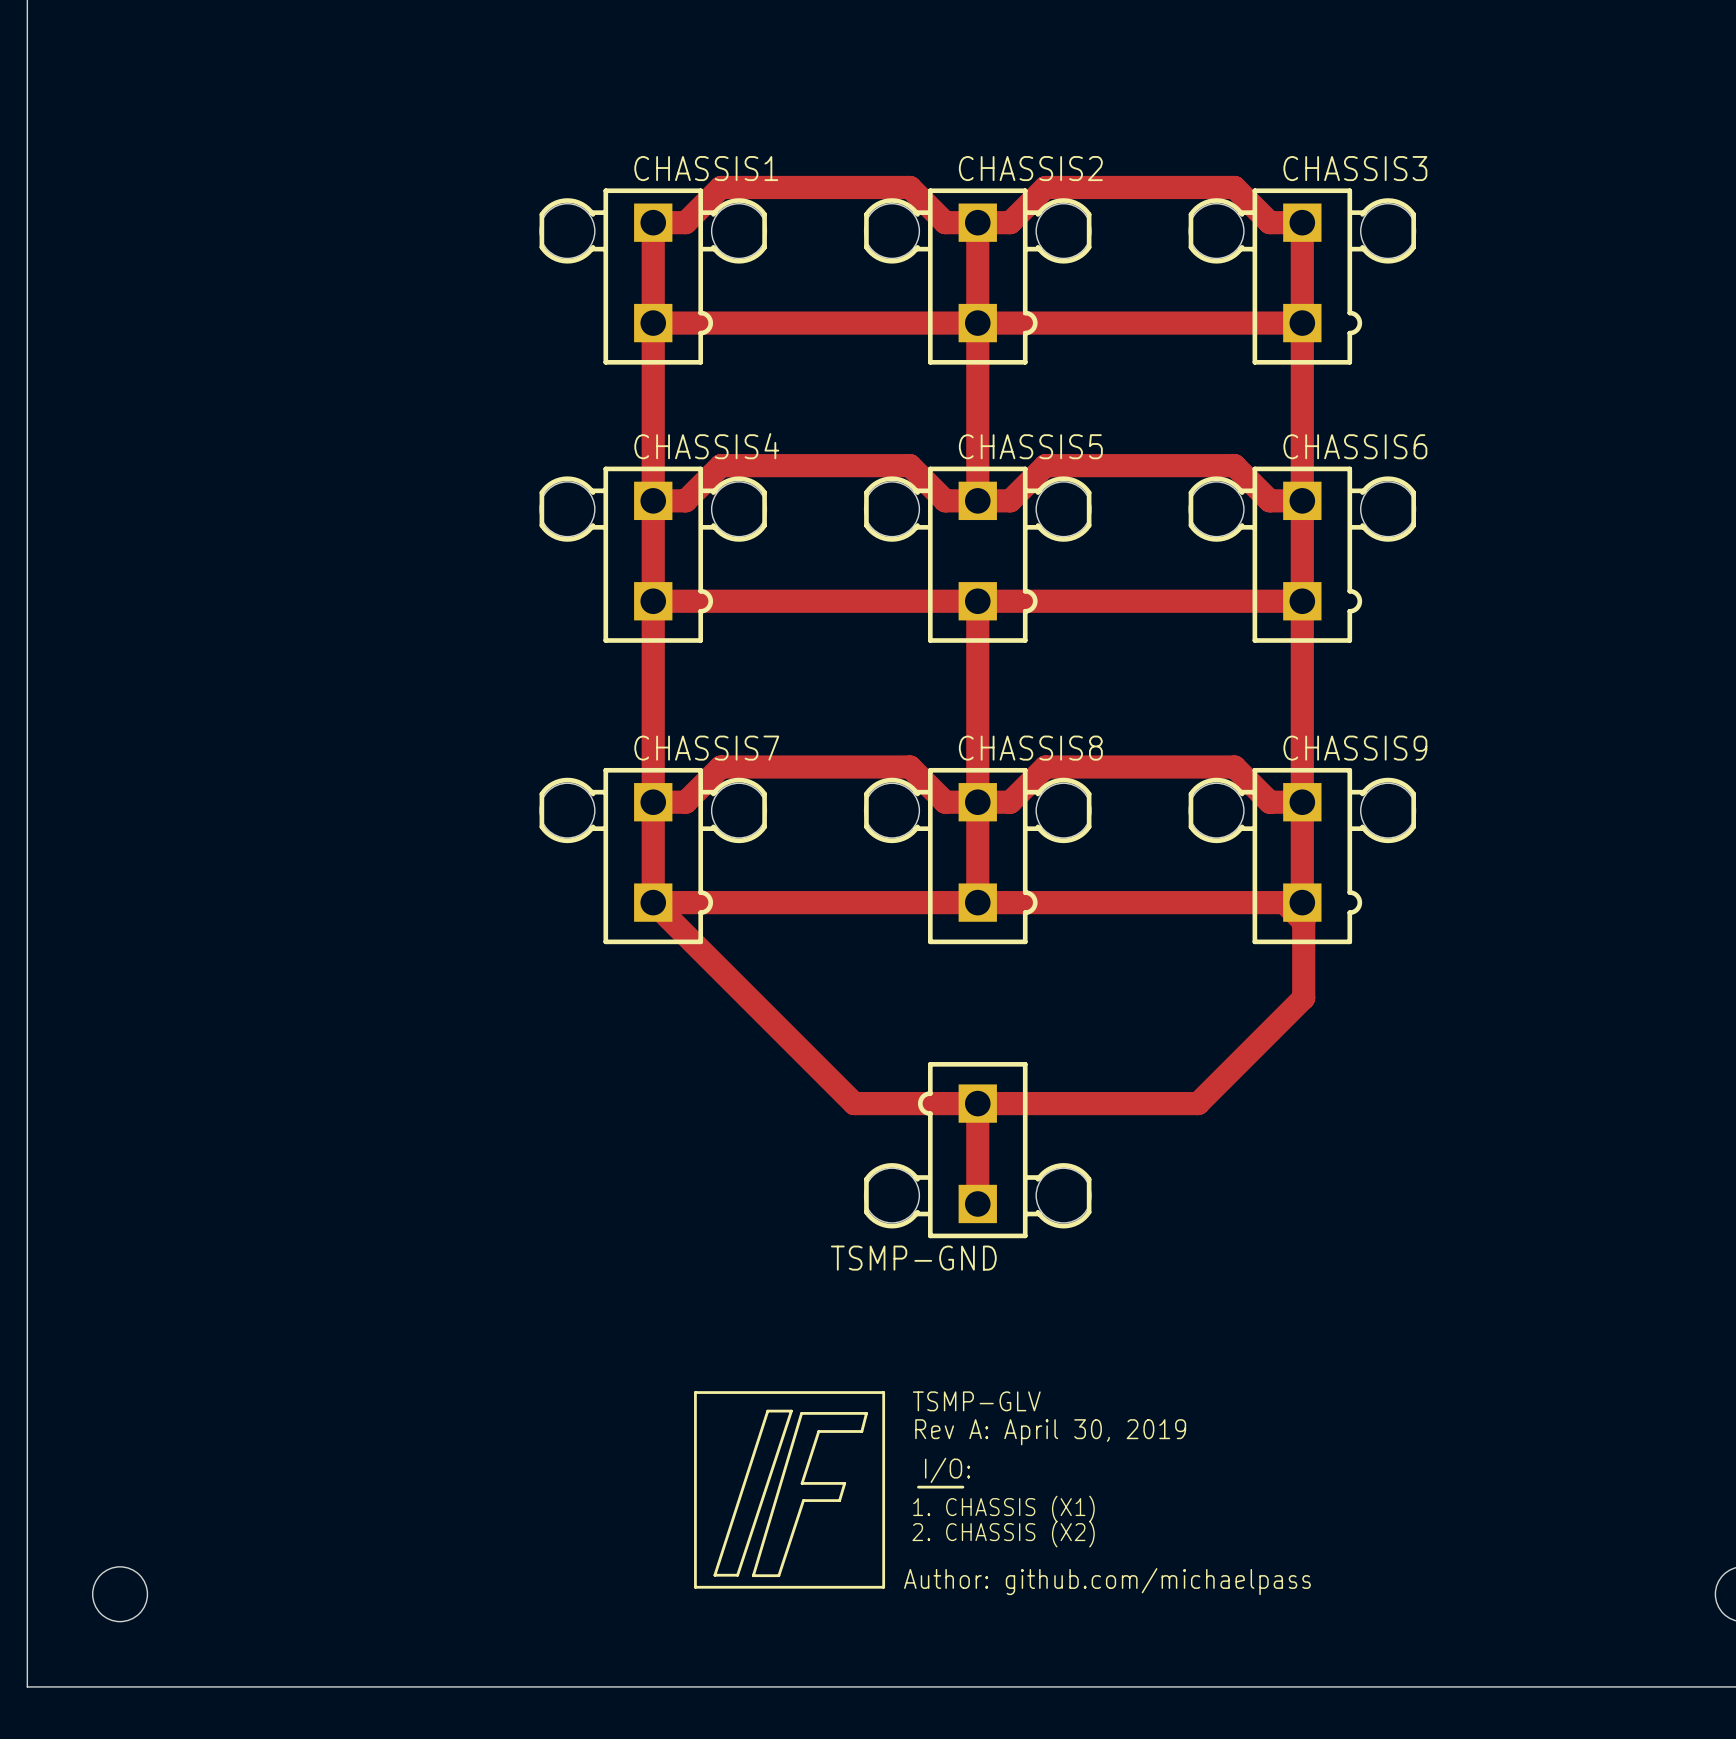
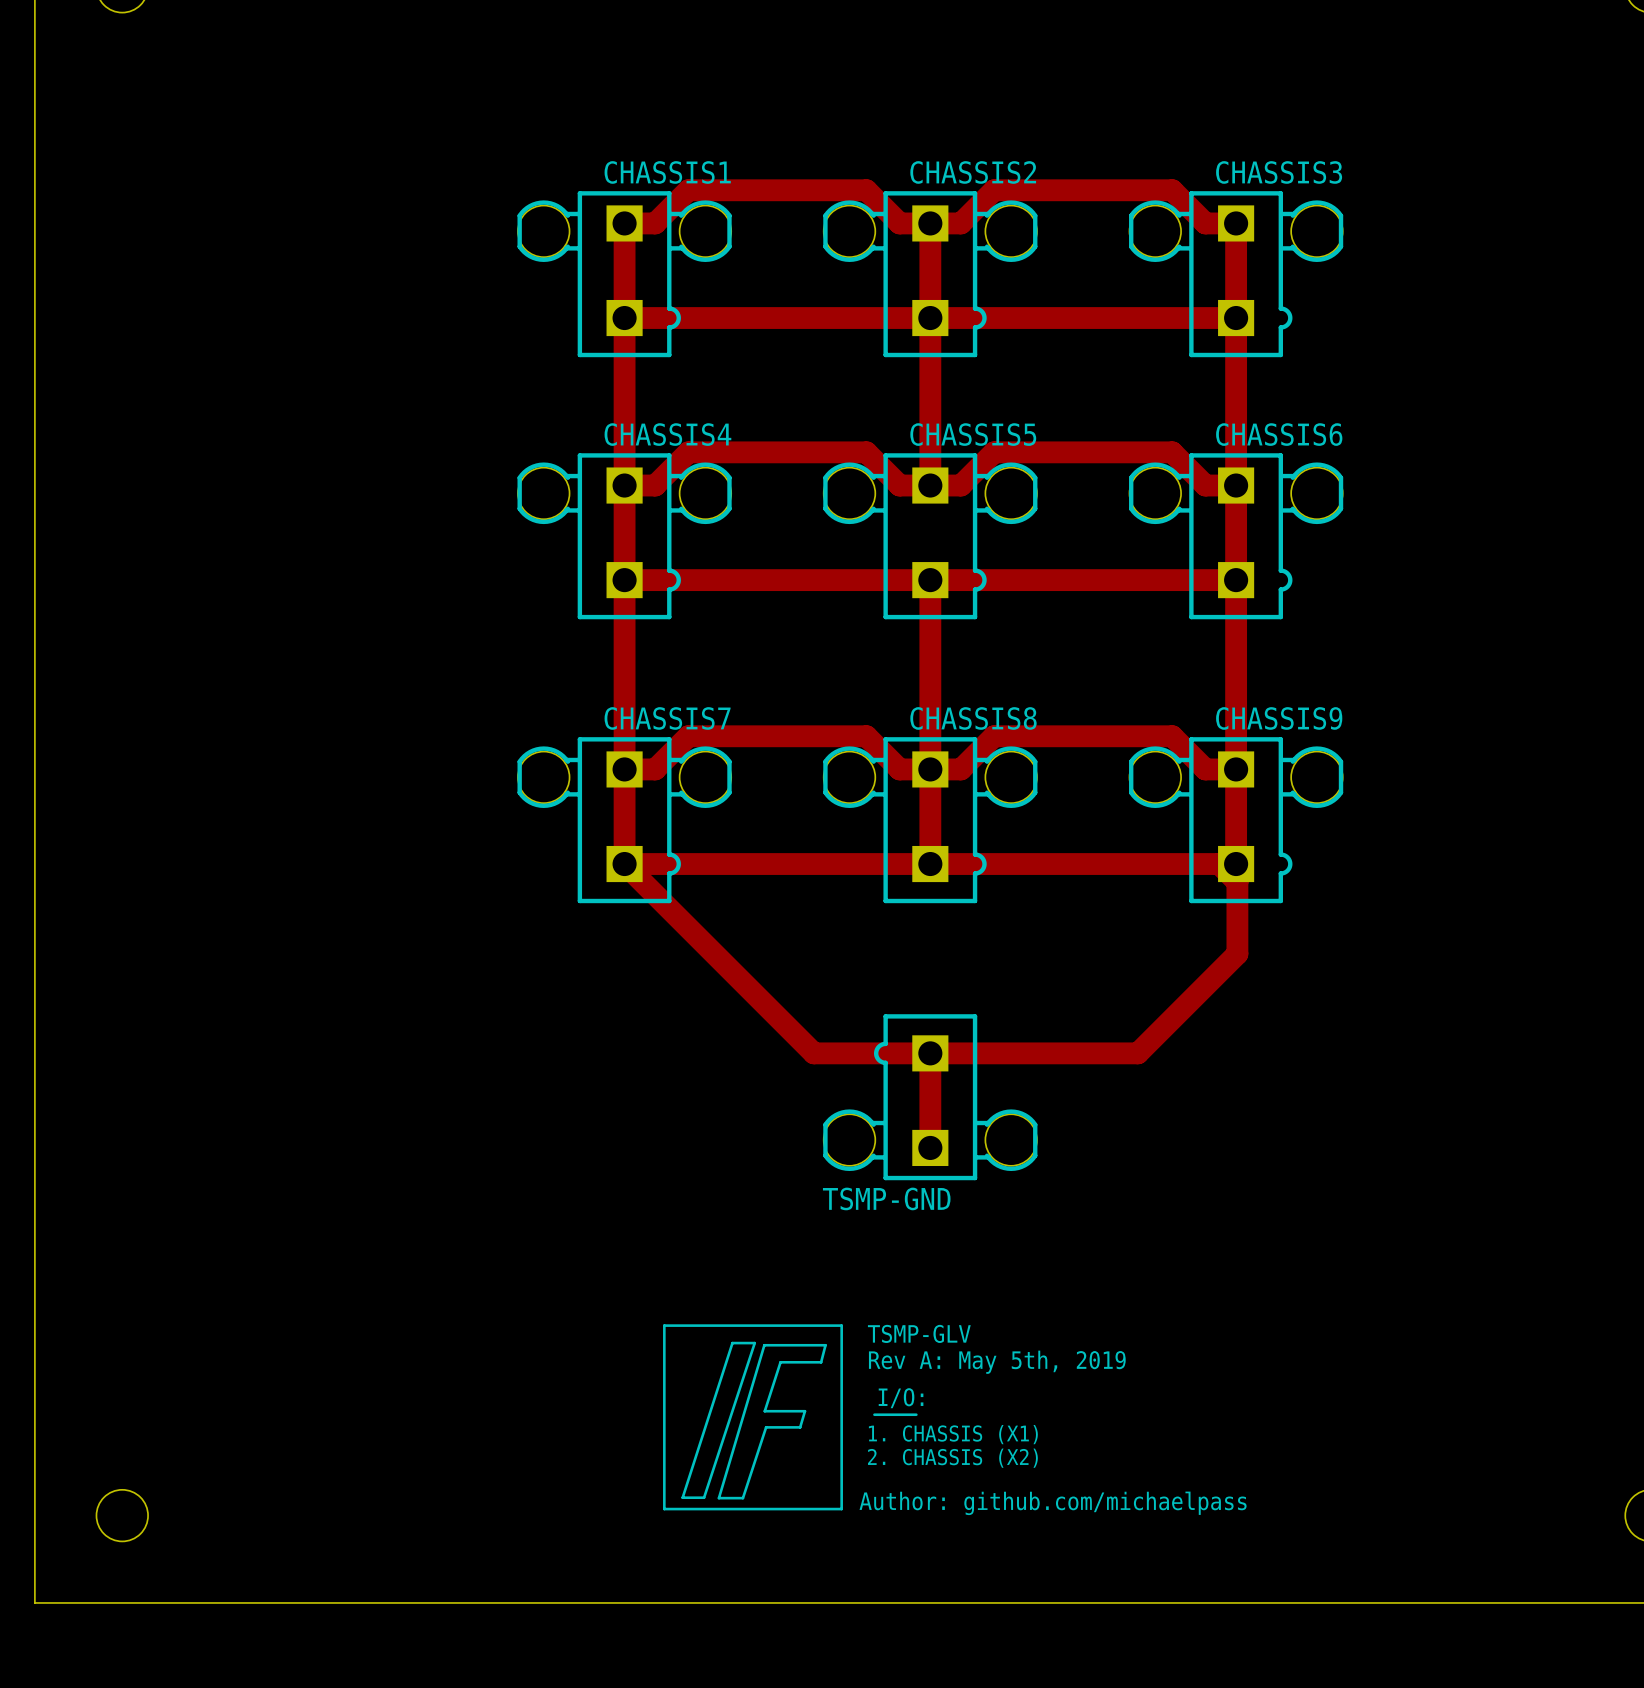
text: Rev A: April 30, 2019 (1050, 1432) -> Rev A: May 5th, 2019 (997, 1362)

